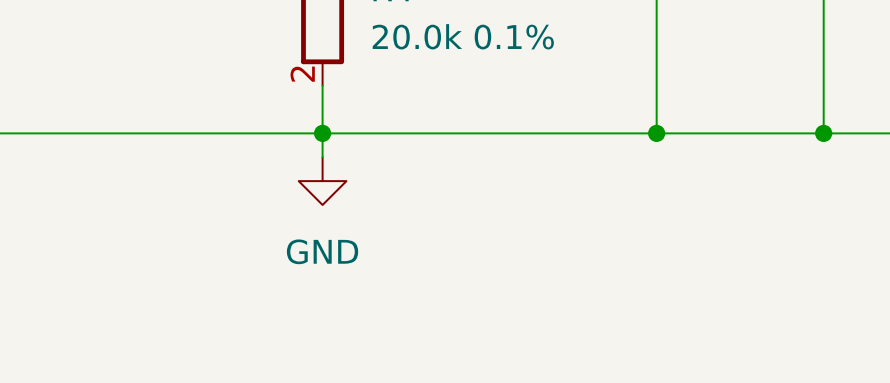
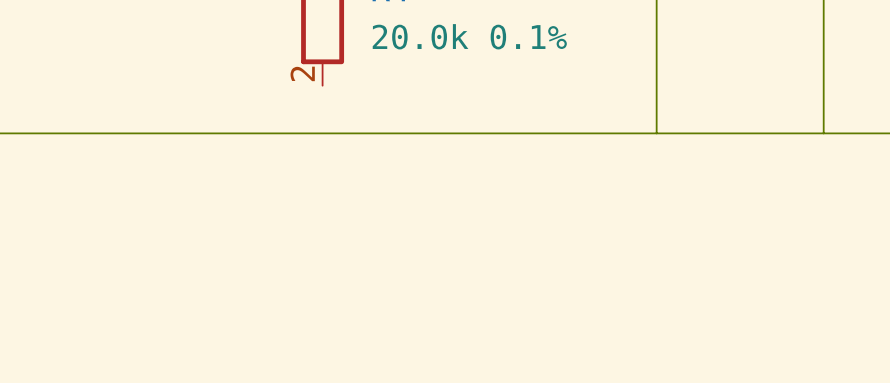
wire: (322, 85) (322, 157) -> none
junction: (322, 133) -> none
junction: (656, 133) -> none
junction: (823, 133) -> none
power symbol: GND (322, 181) -> none

